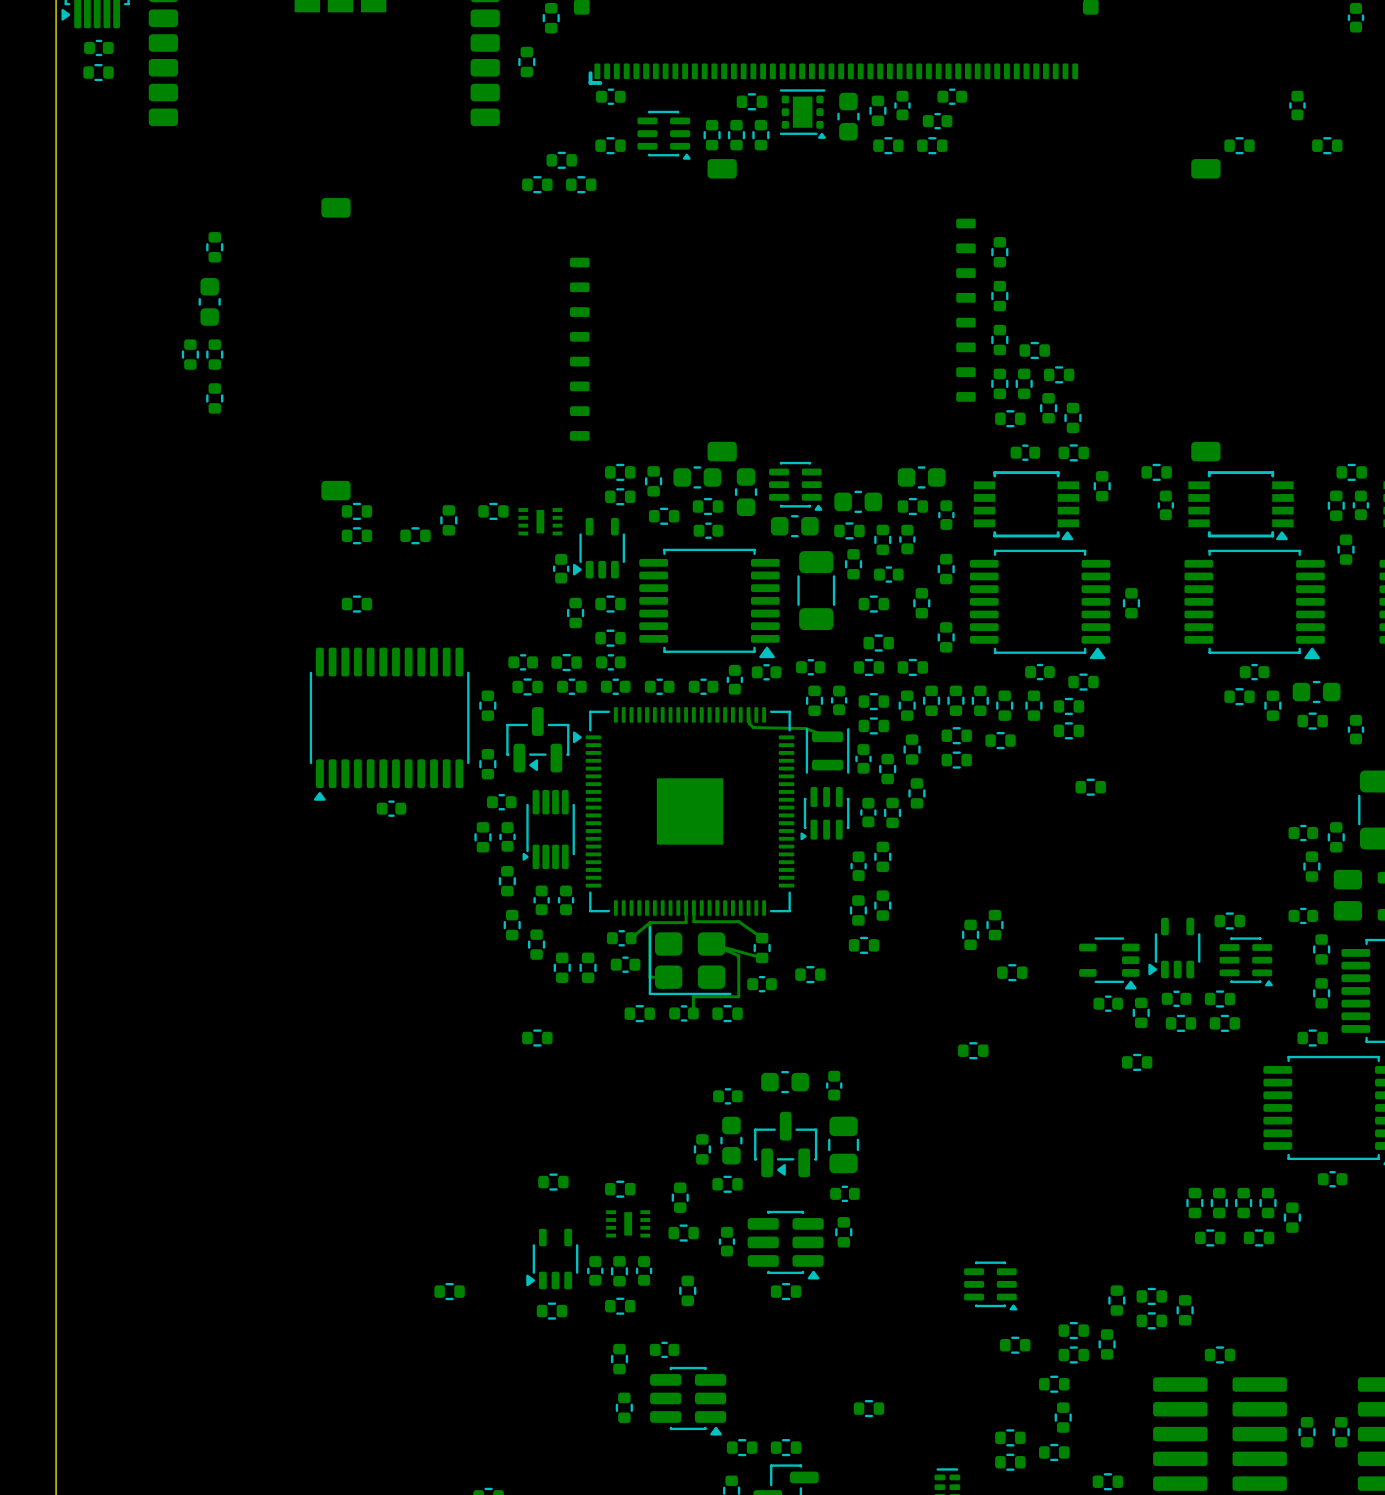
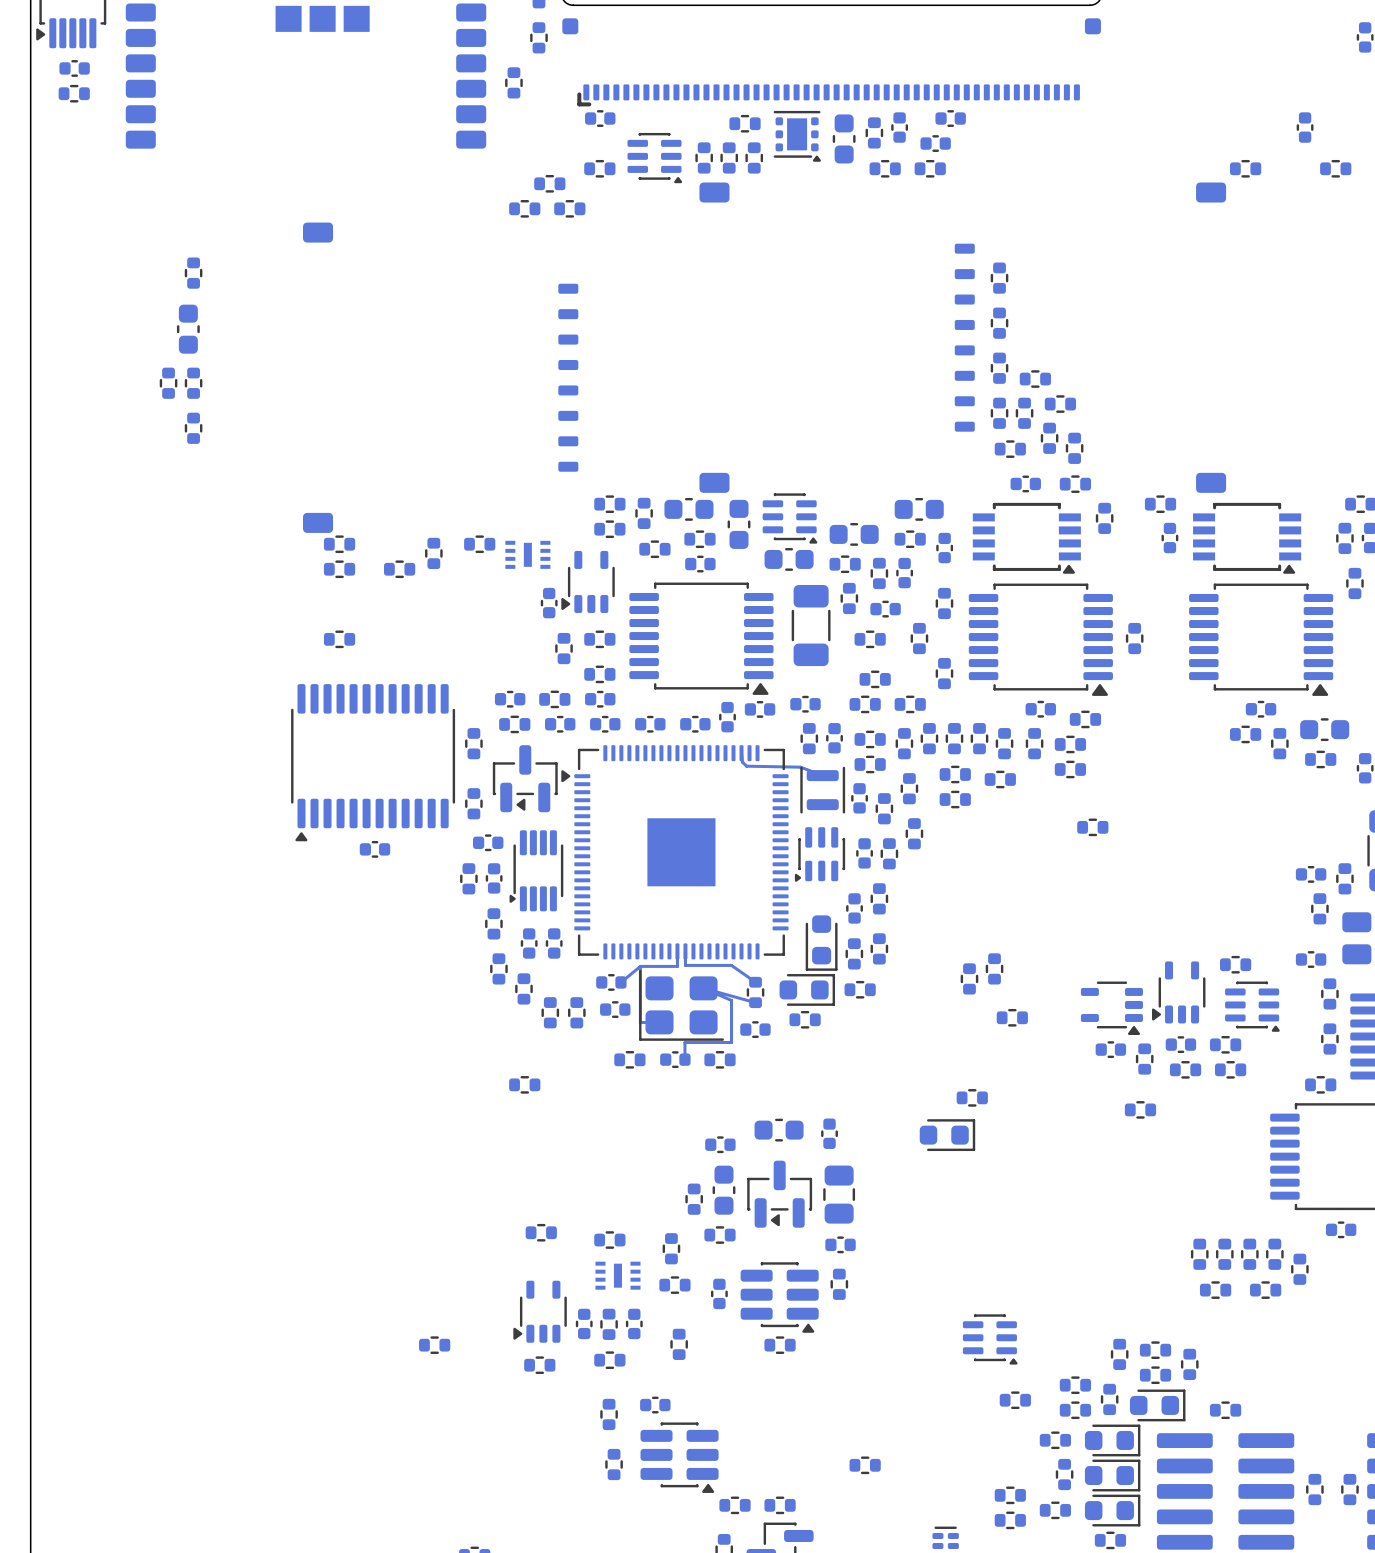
part: none -> (821, 943)
part: none -> (807, 989)
part: none -> (947, 1135)
part: none -> (1157, 1405)
part: none -> (1112, 1440)
part: none -> (1112, 1475)
part: none -> (1112, 1510)

